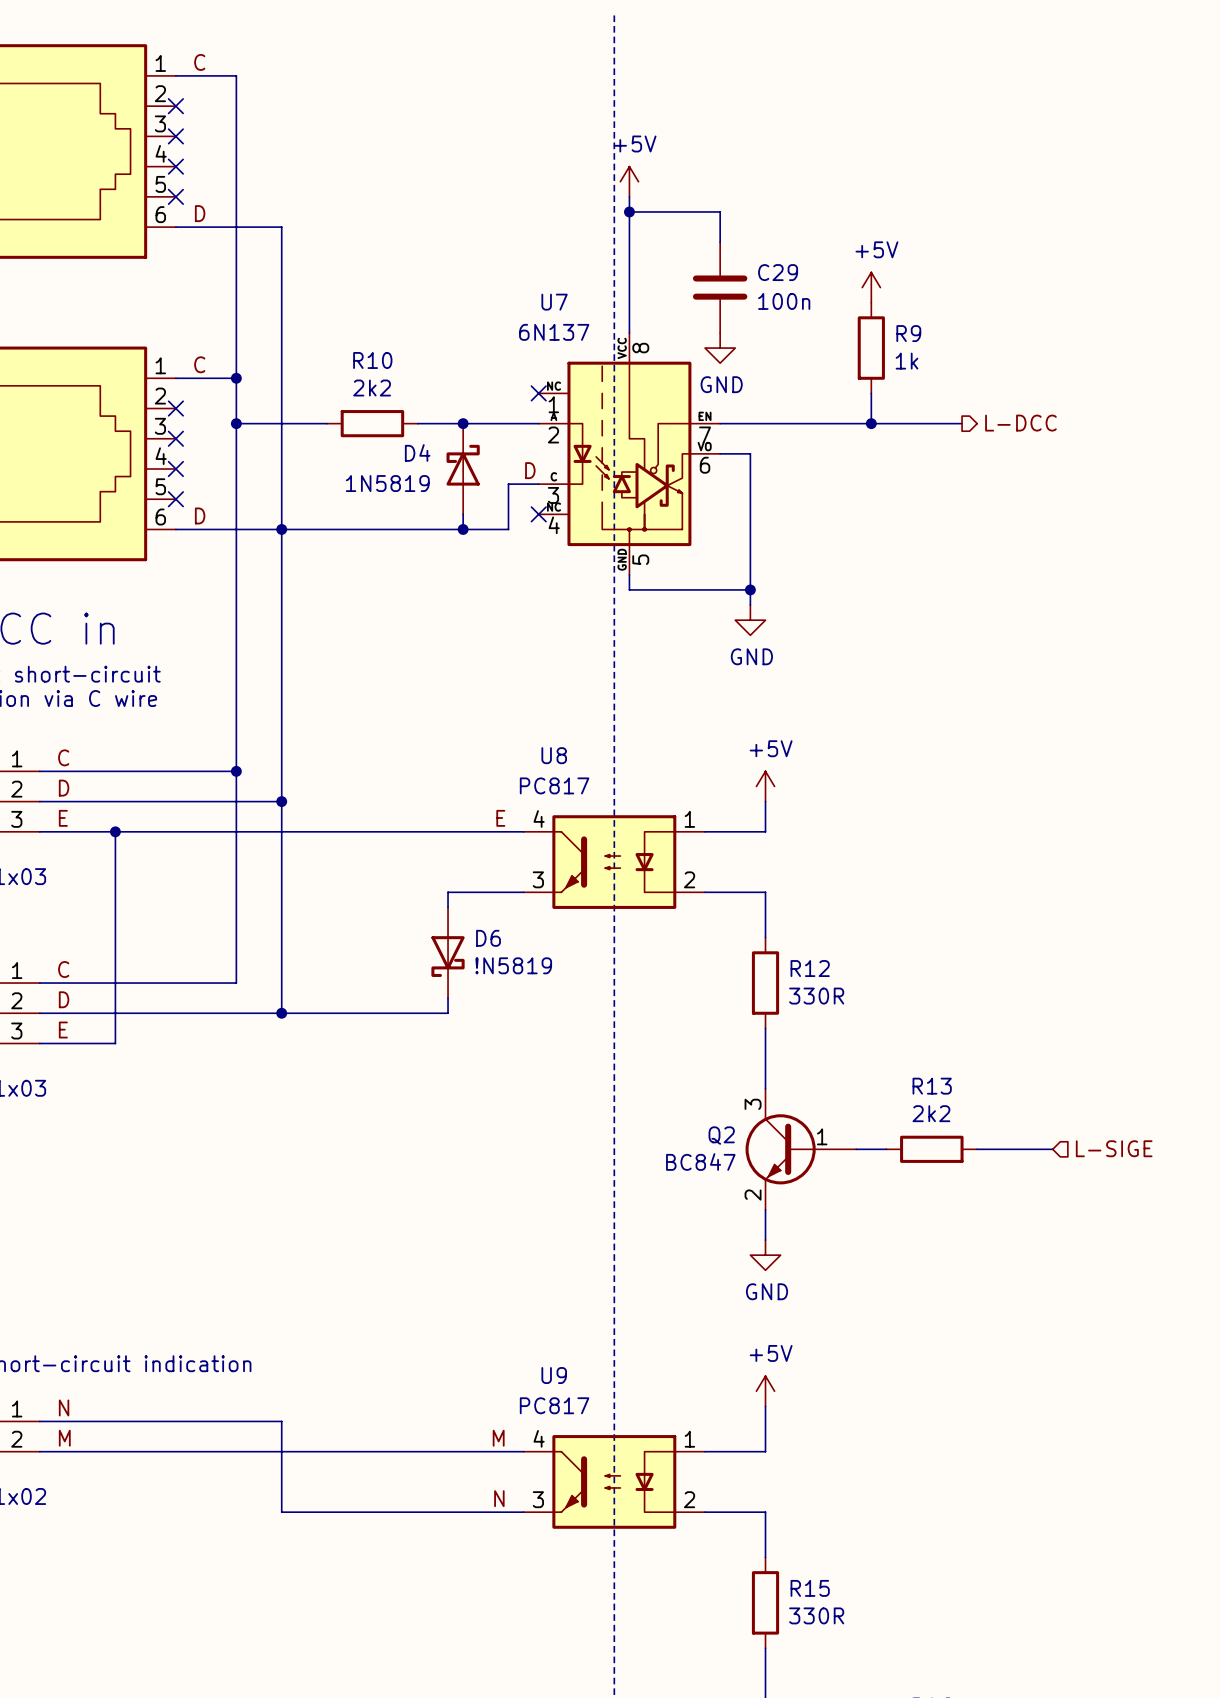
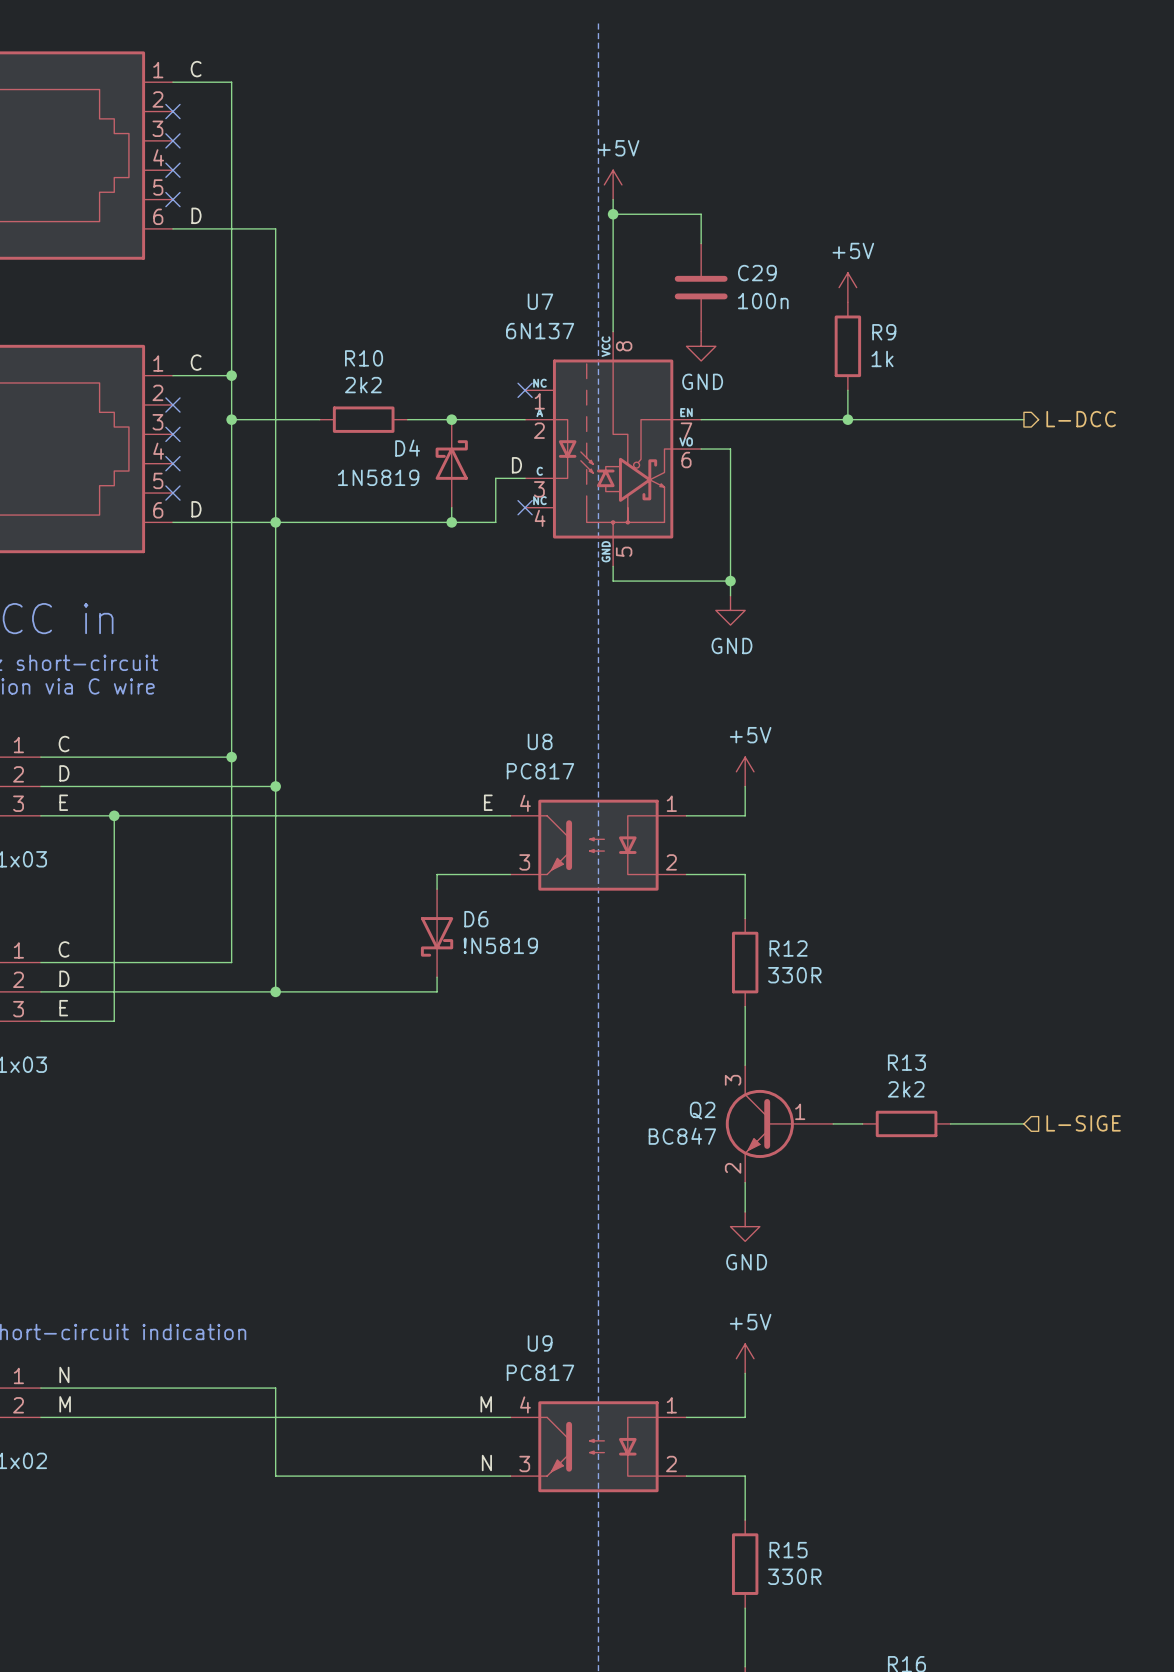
wire: none -> (935, 419) (1023, 419)
hierarchical label position: L-DCC (1020, 423) -> L-DCC (1081, 419)

